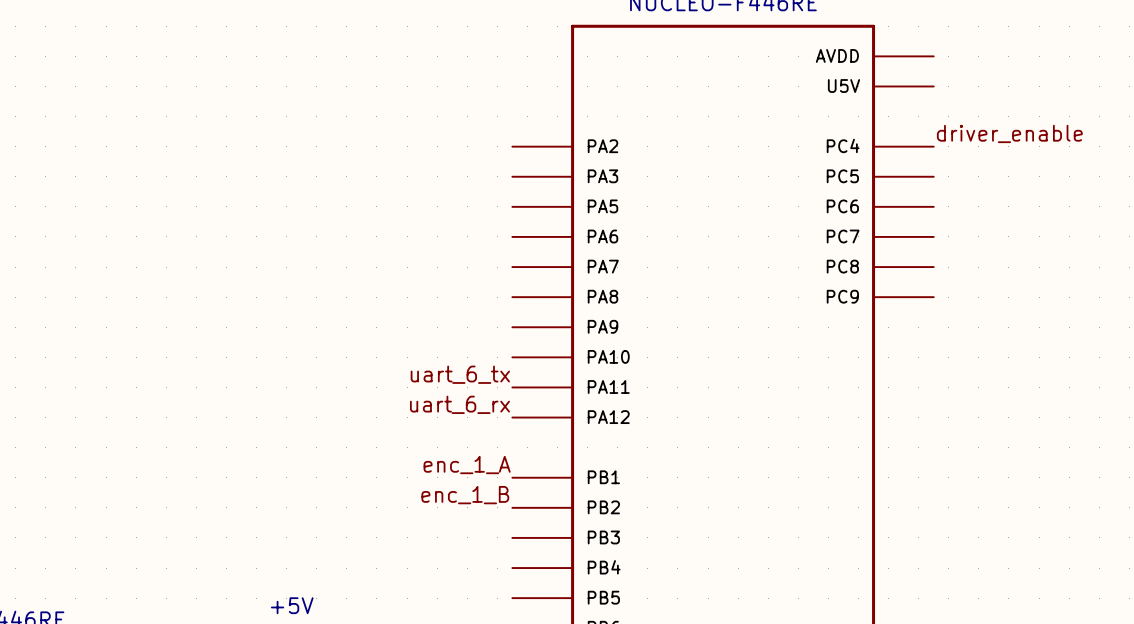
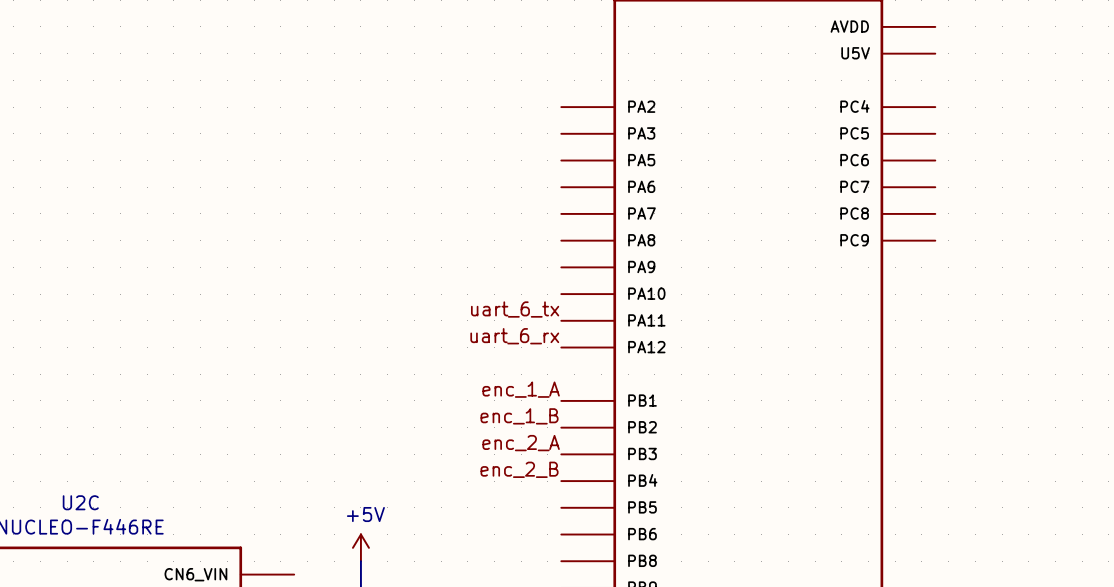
label: driver_enable (1009, 133) -> none
label: none -> enc_2_A (521, 443)
label: none -> enc_2_B (519, 469)

